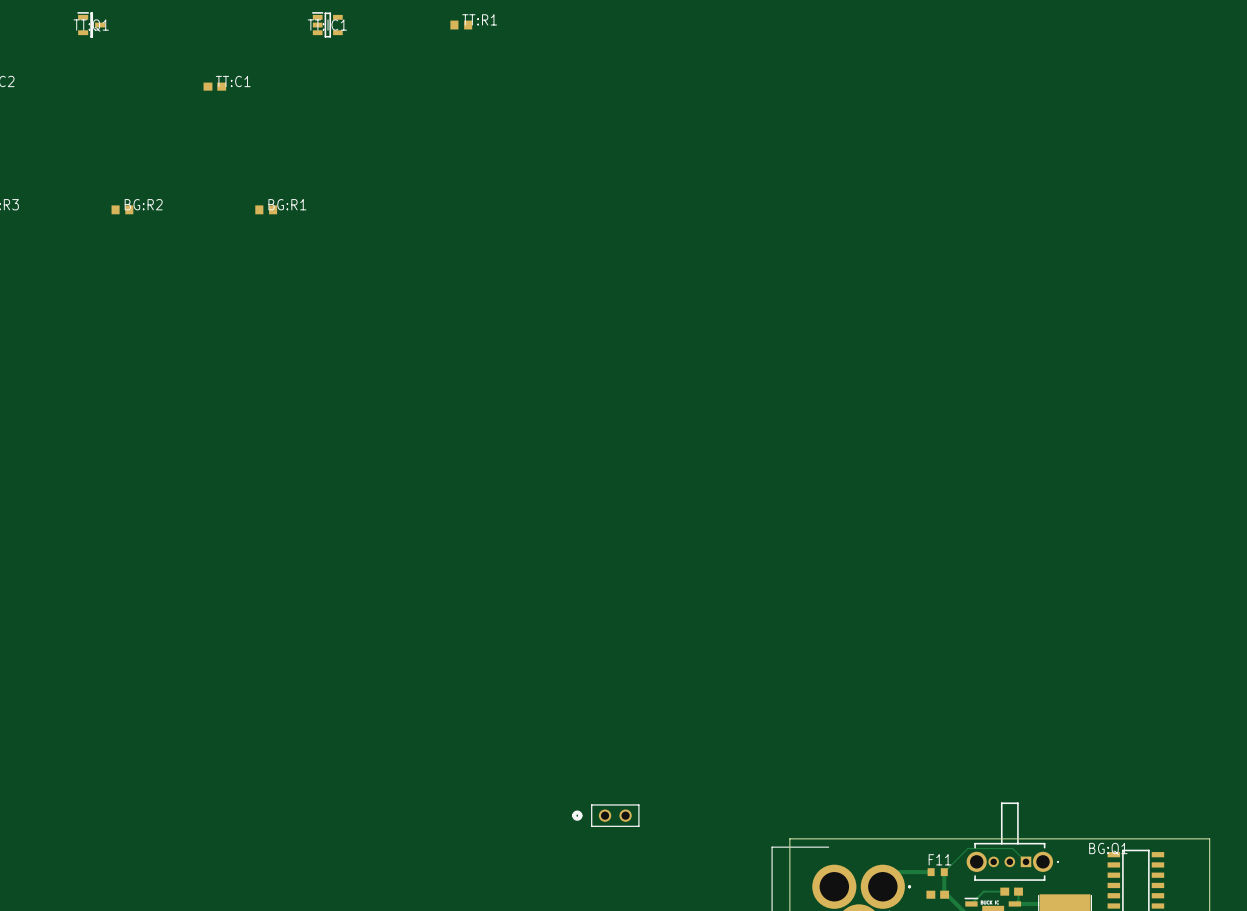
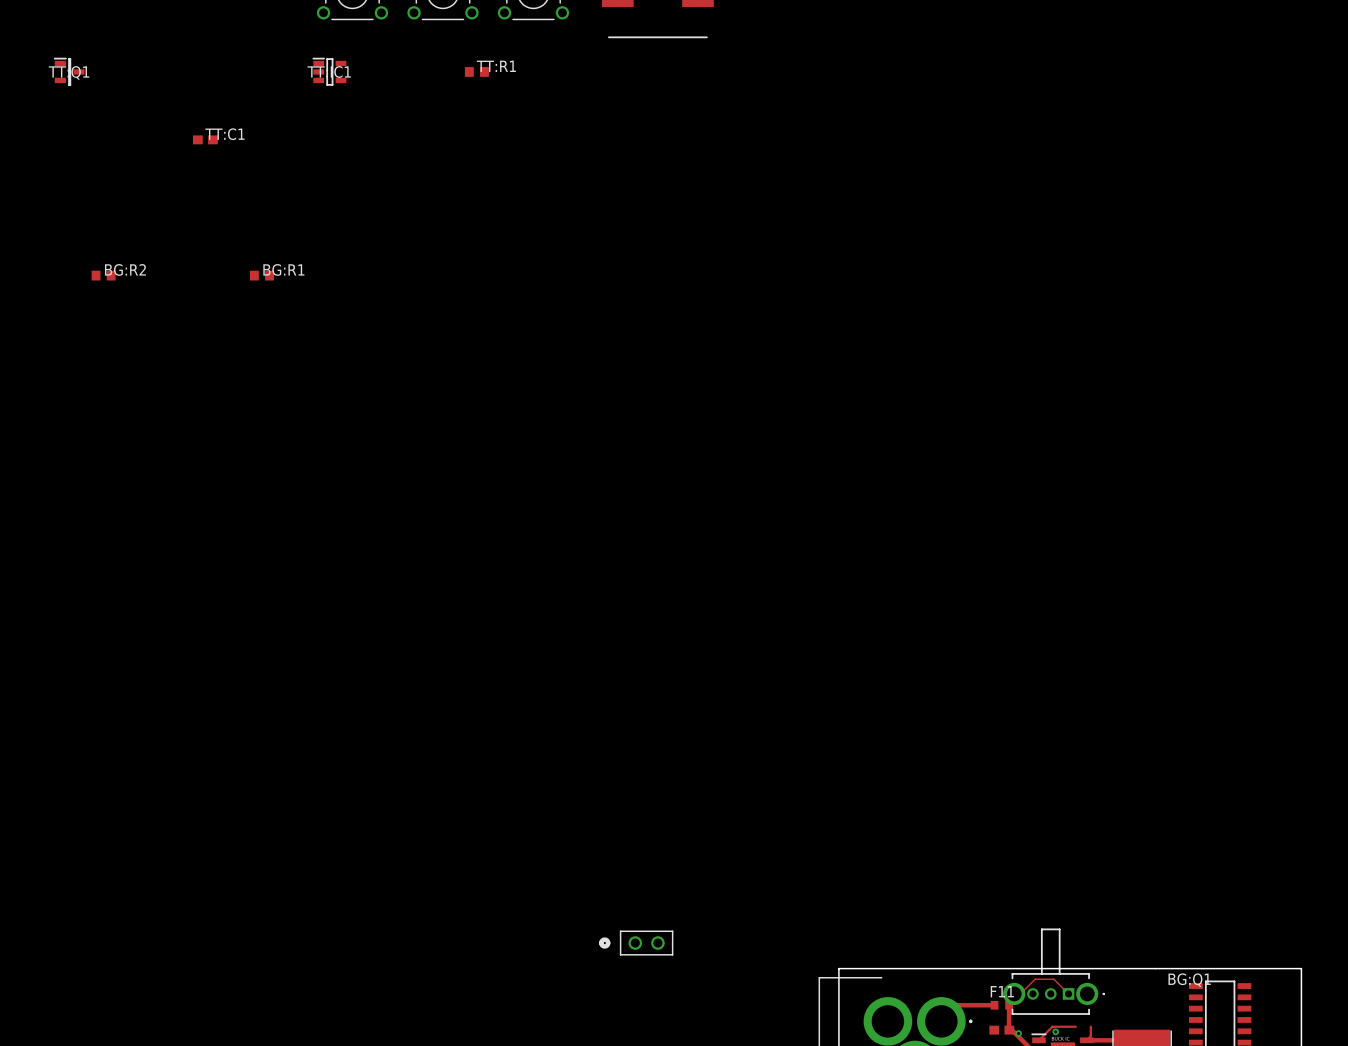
part position: (1012, 841) -> (1053, 971)
track: (984, 848) (1012, 848) (1026, 861) -> (1053, 979) (1068, 993)
part: (1011, 891) -> none
via: none -> (1055, 1031)
via: none -> (1018, 1033)

